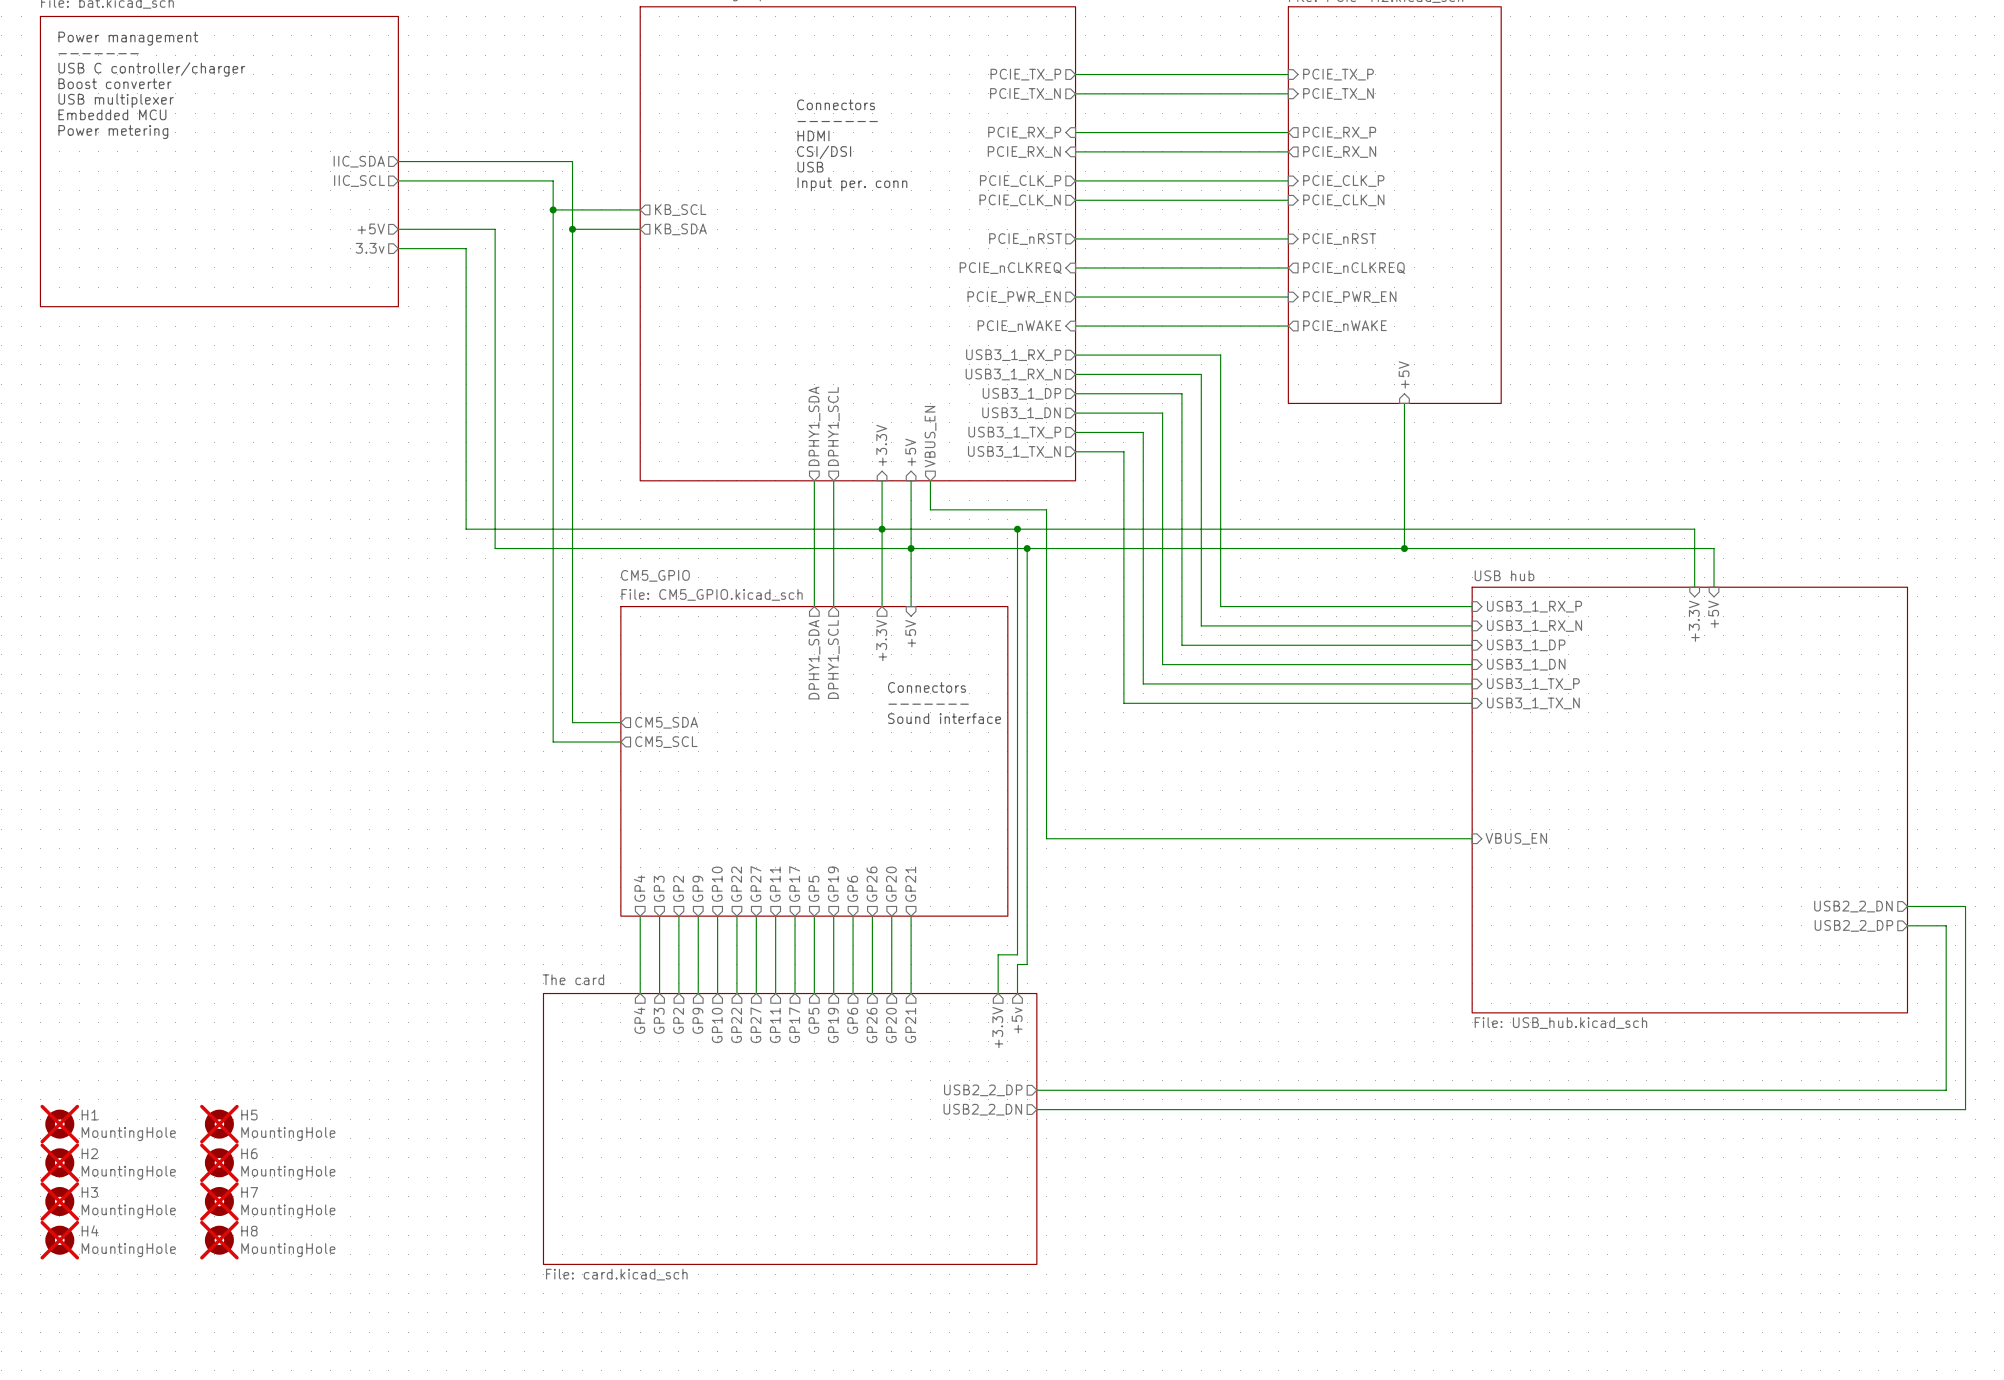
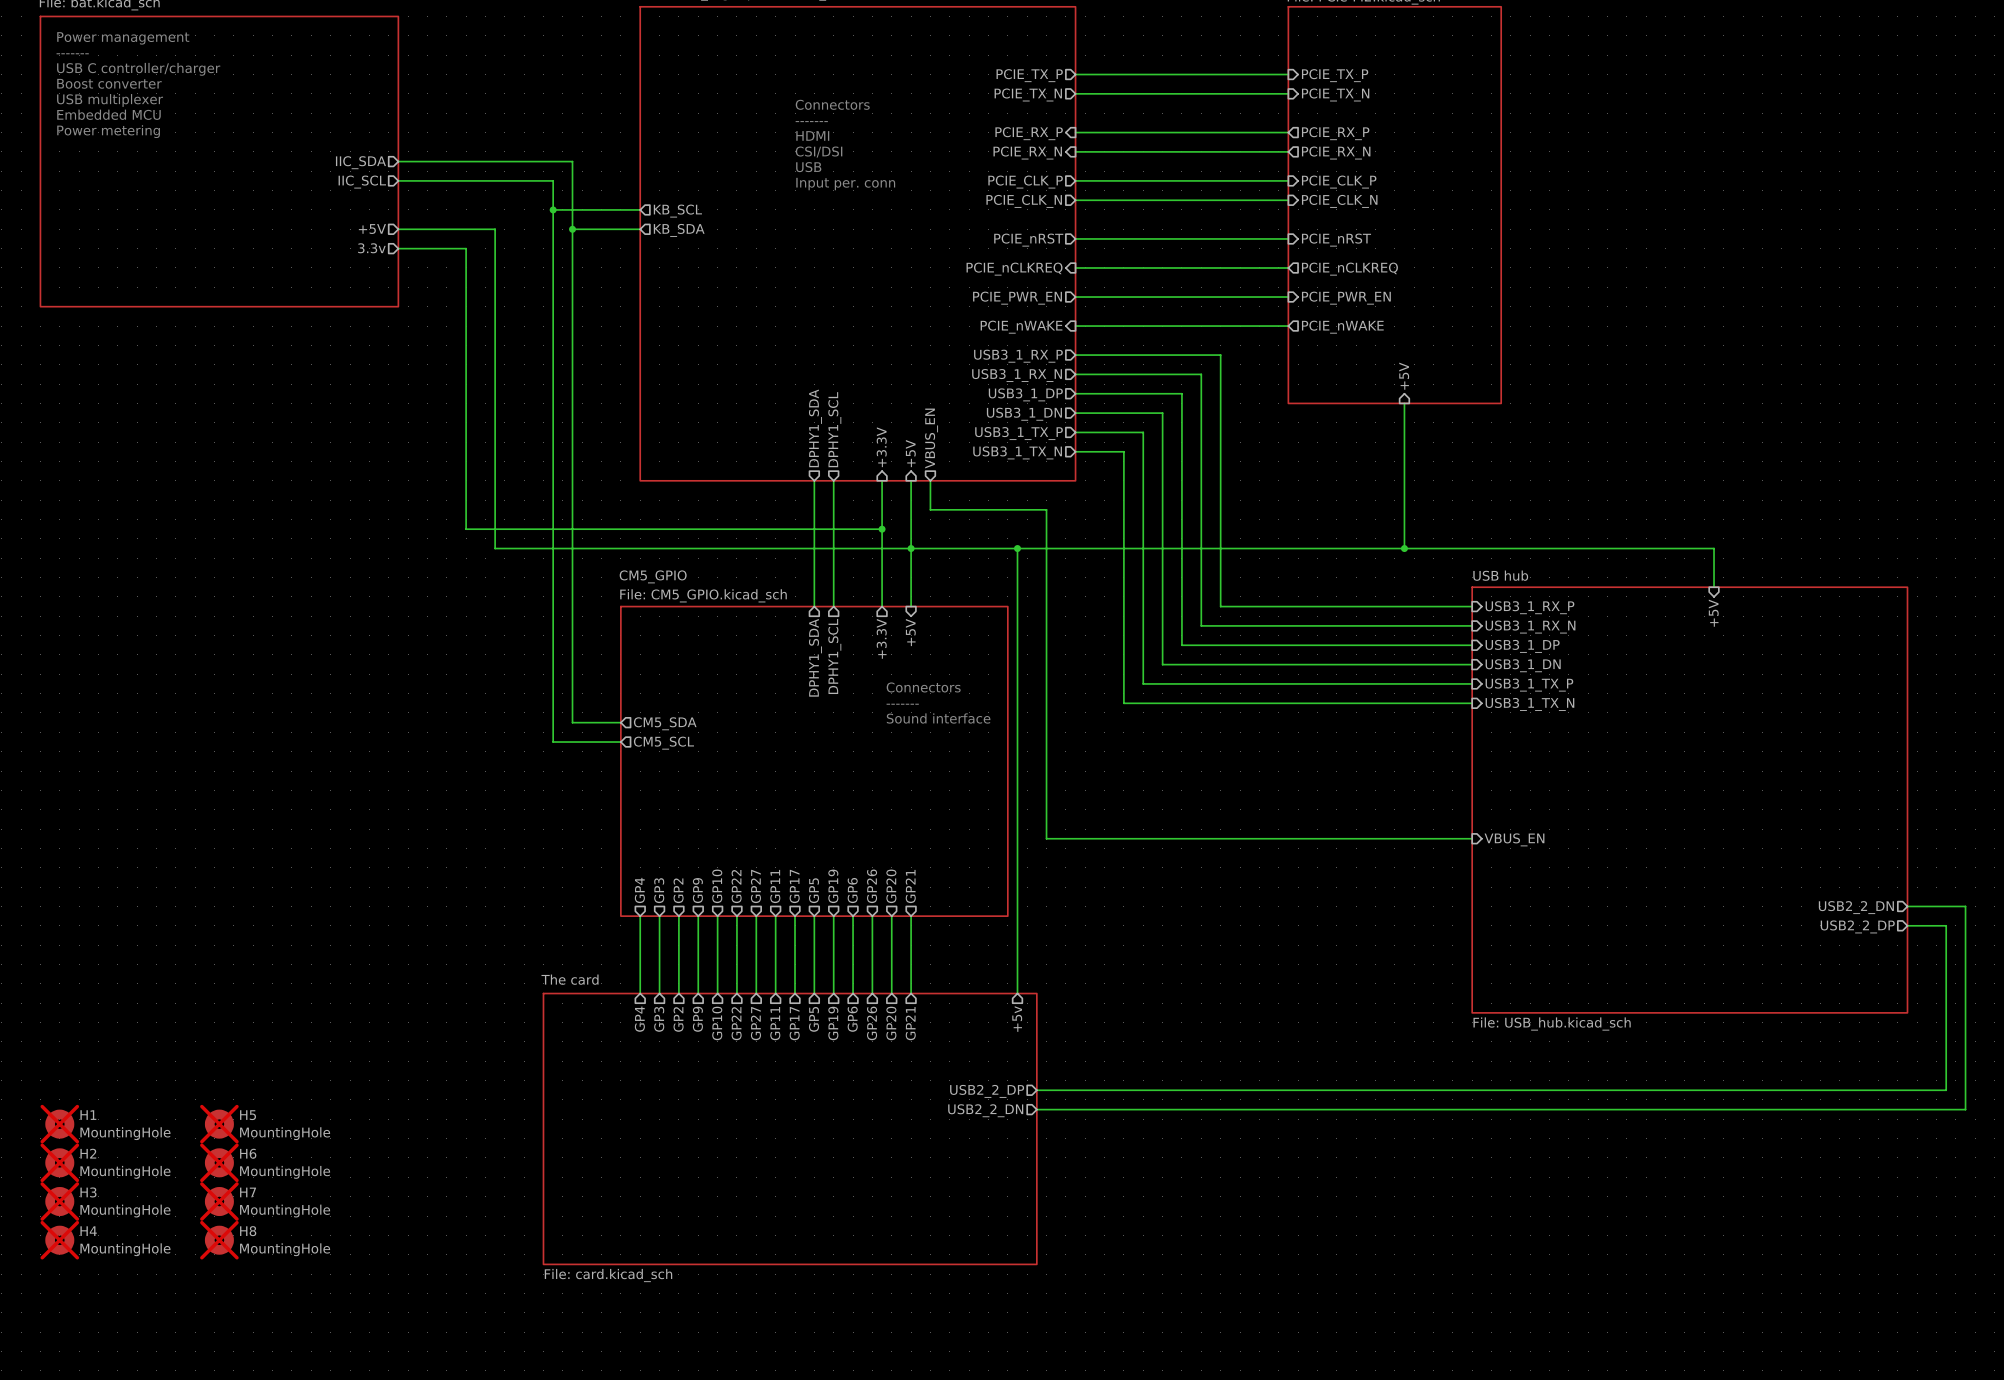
wire: (882, 529) (1694, 529) (1694, 587) -> none
wire: (1017, 529) (1017, 548) -> none
junction: (1017, 529) -> none
junction: none -> (1017, 548)
wire: (1027, 548) (1027, 964) (1017, 964) -> none
junction: (1027, 548) -> none
sheet pin: +3.3V (1694, 621) -> none
wire: (1017, 954) (998, 954) (998, 993) -> (1017, 954) (1017, 964)
sheet pin: +3.3V (997, 1027) -> none

